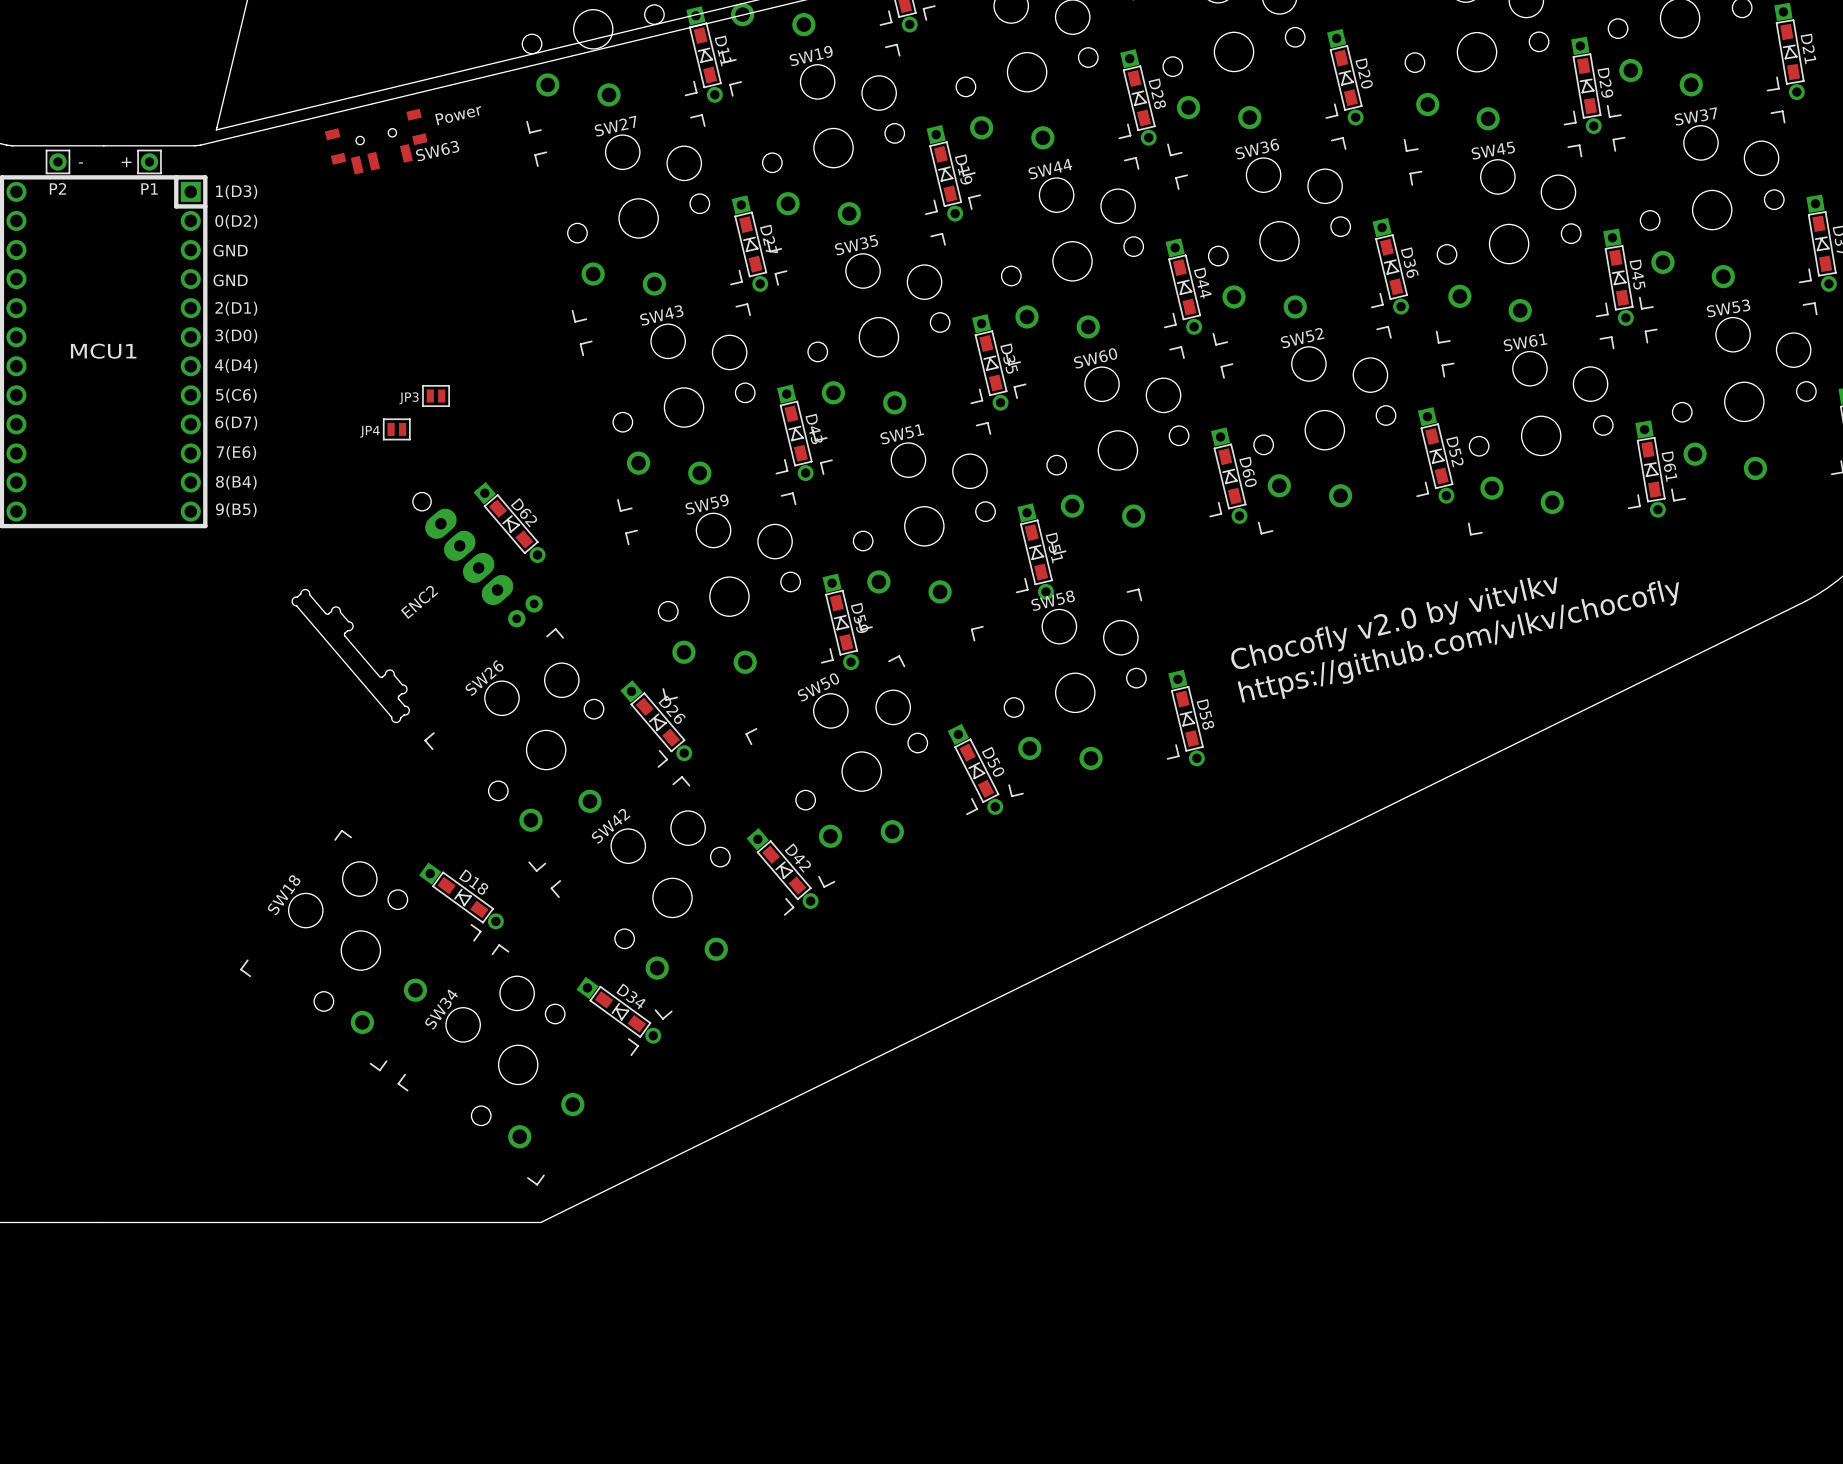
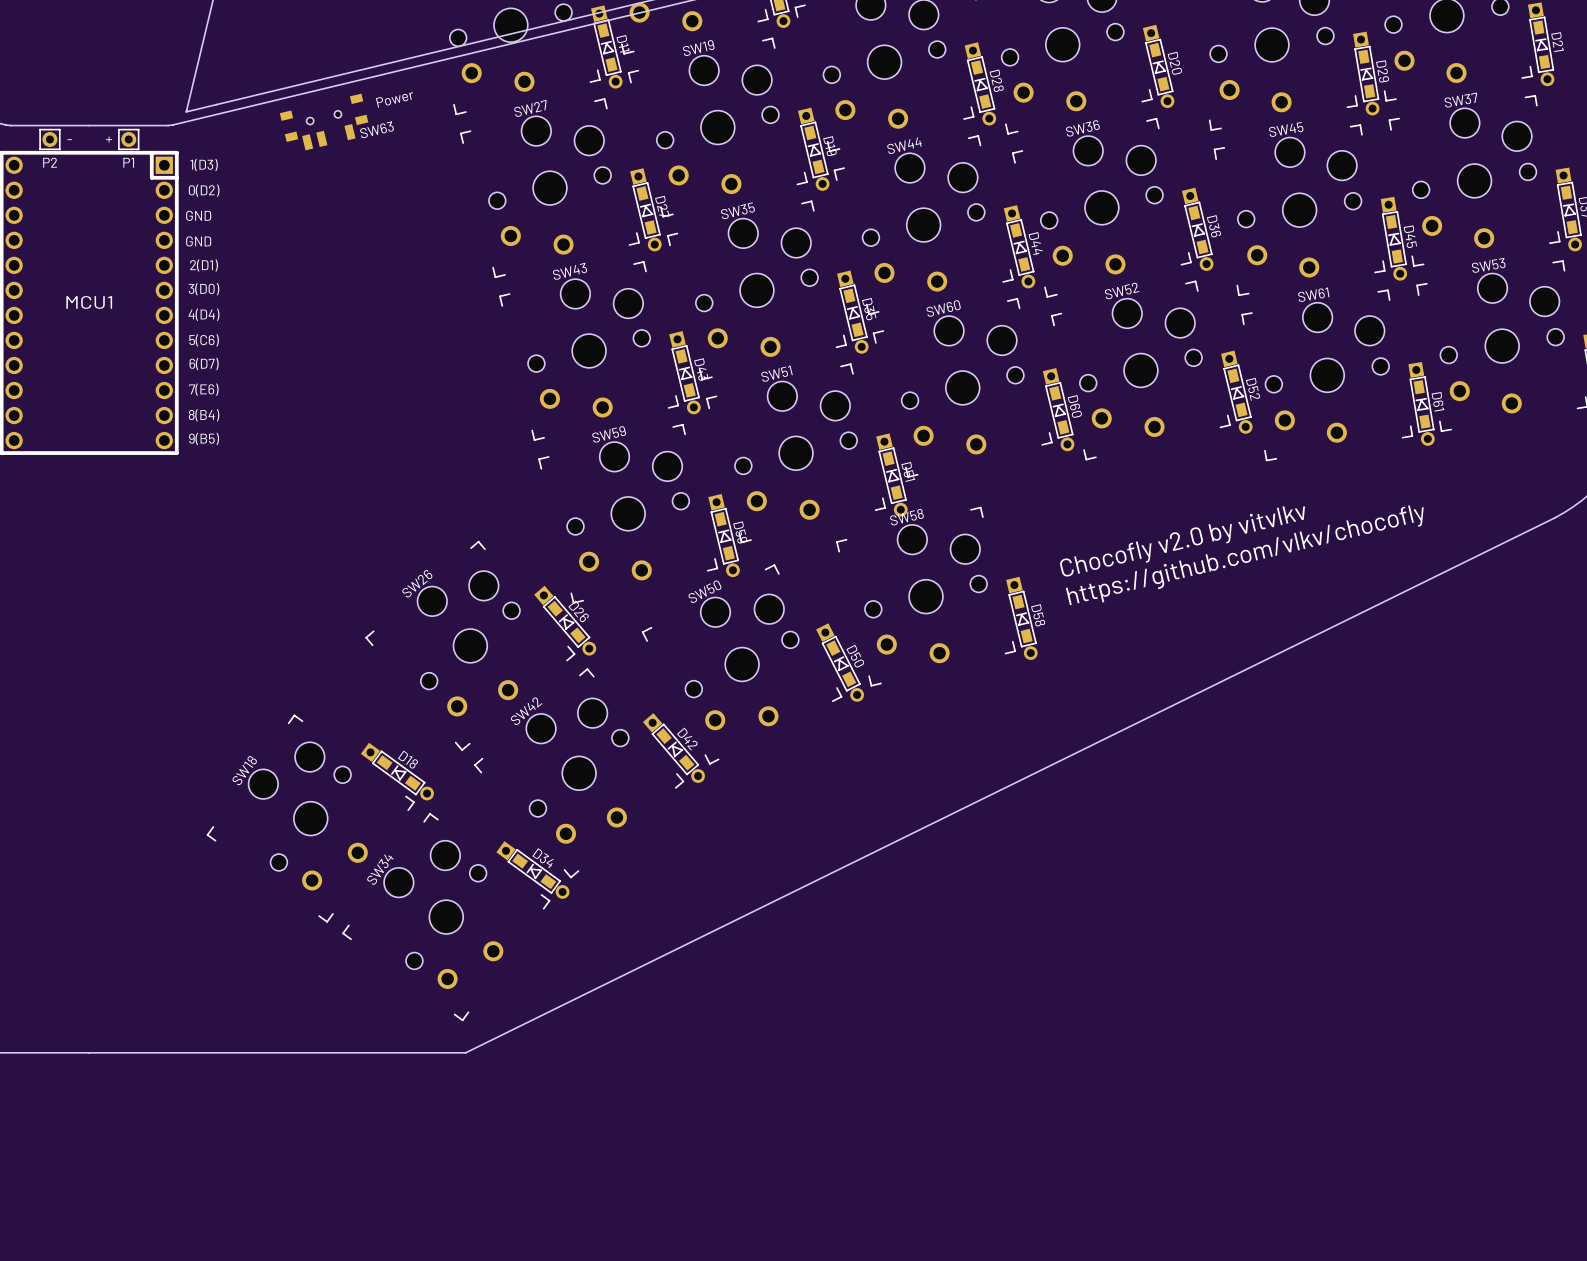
JP3: (436, 396) -> none
JP4: (396, 429) -> none
D62: (509, 522) -> none
ENC2: (417, 607) -> none

